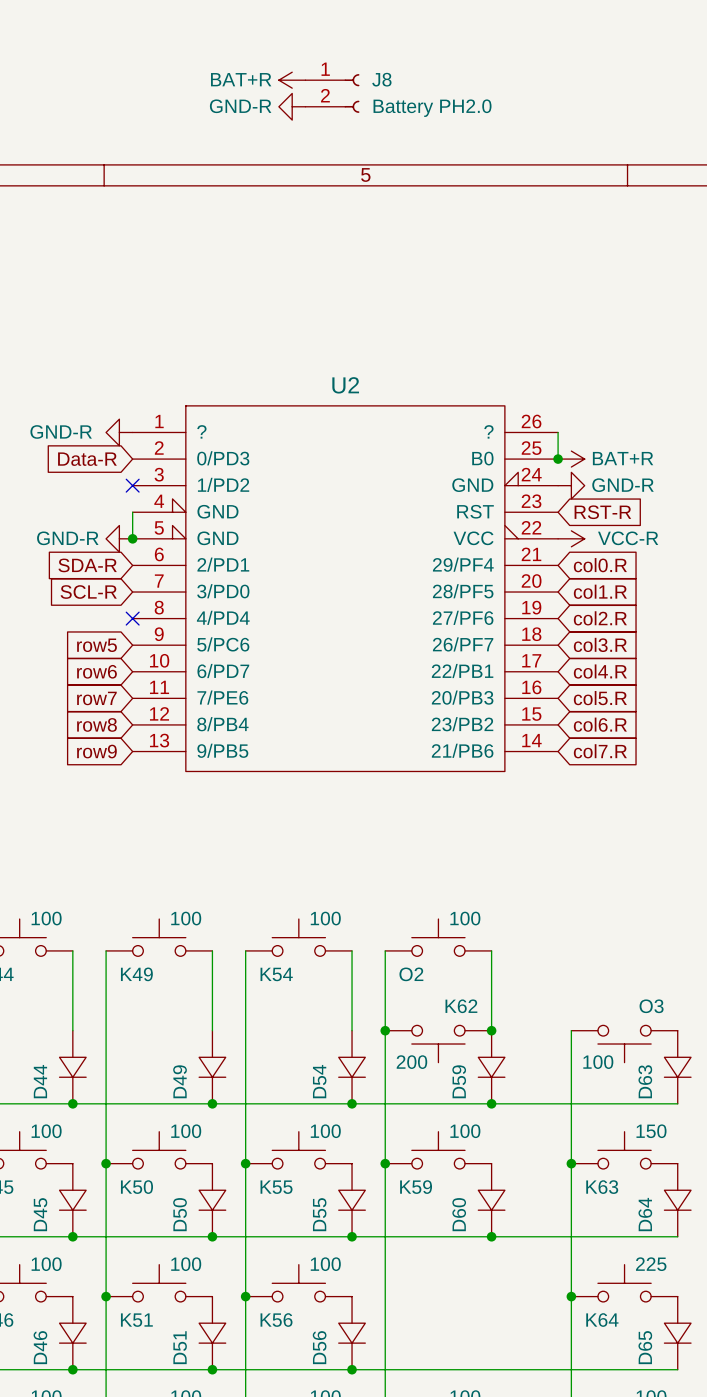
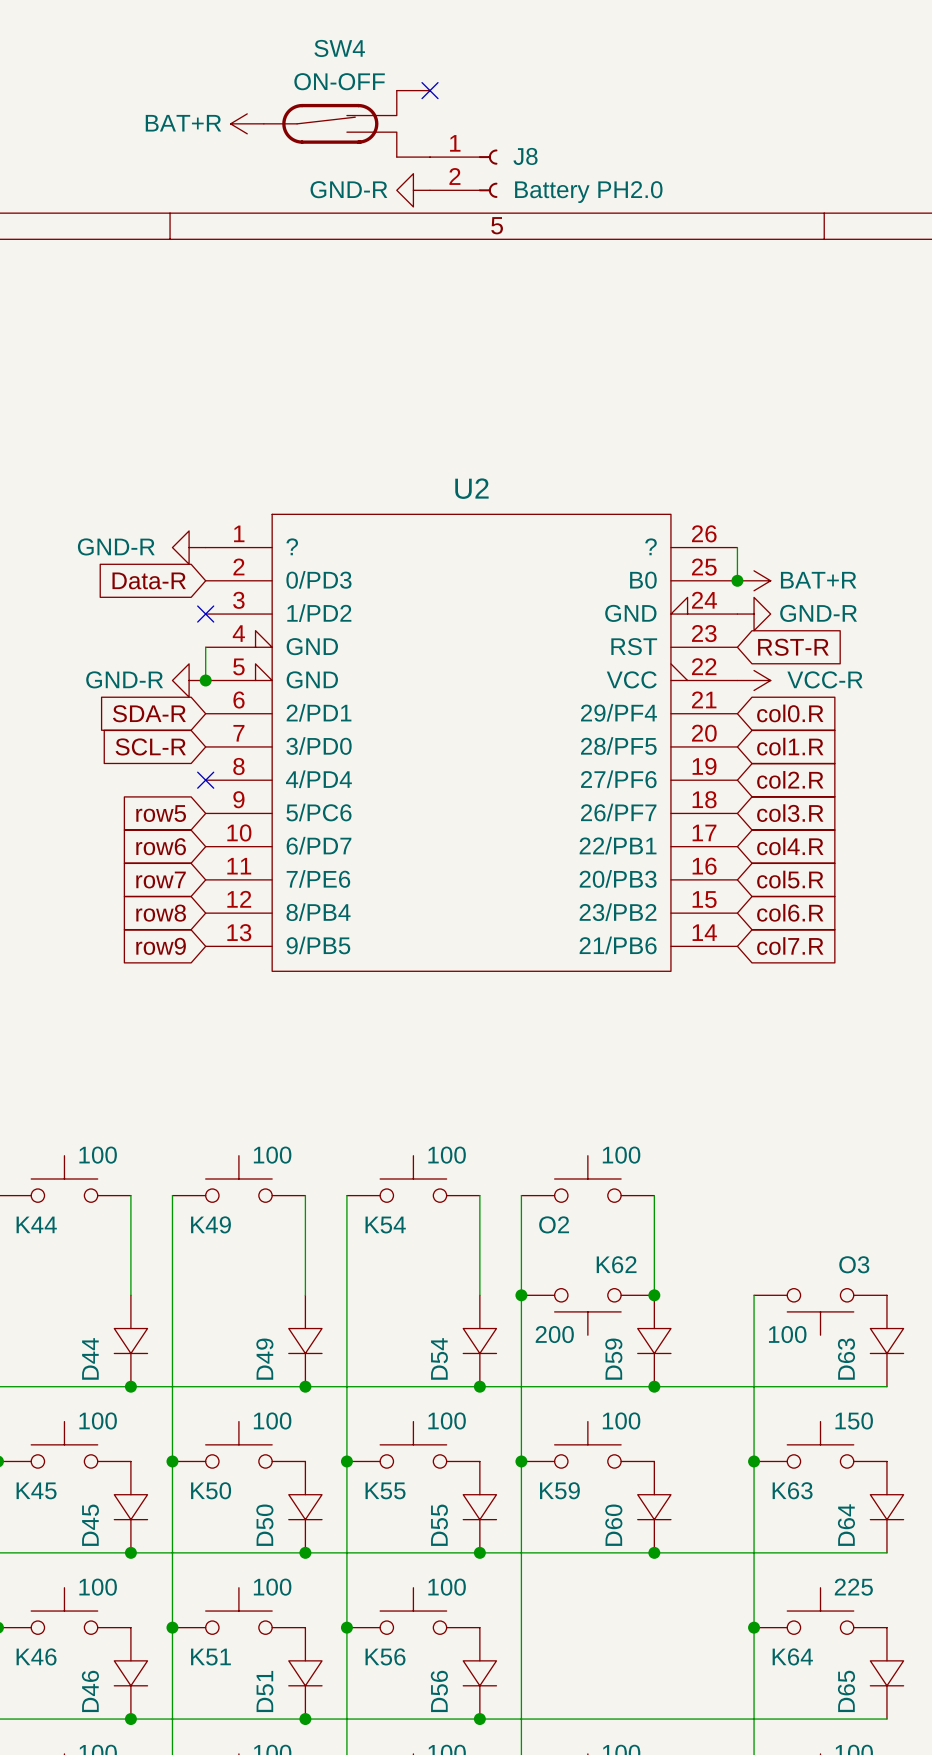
no-connect mark: none -> (430, 90)
power symbol position: BAT+R (292, 80) -> BAT+R (247, 123)
SW4: none -> ON-OFF (346, 123)
J8 position: (332, 93) -> (463, 173)
power symbol position: GND-R (292, 106) -> GND-R (413, 190)

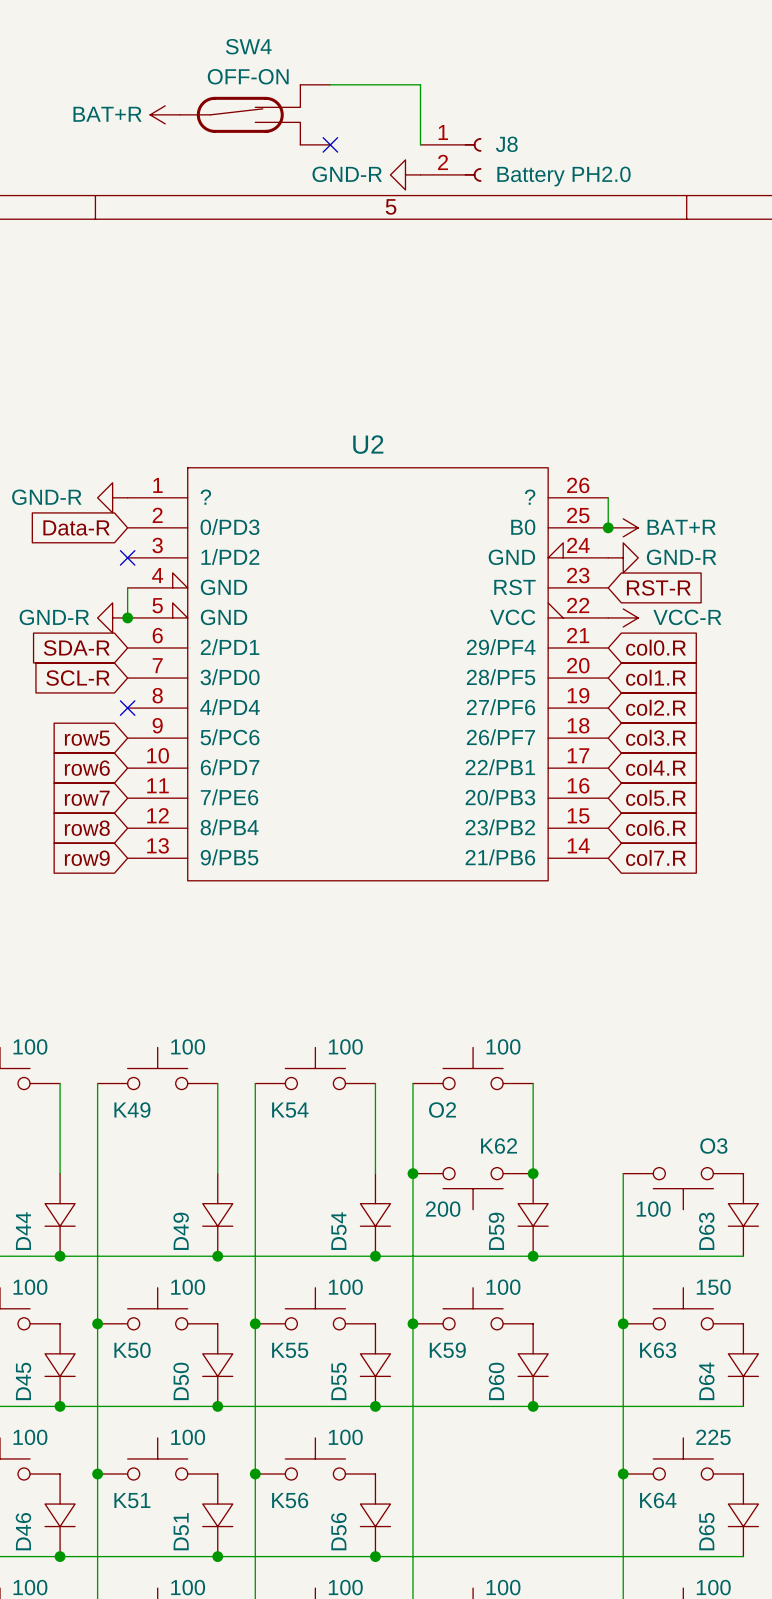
SW4 value: ON-OFF (339, 81) -> OFF-ON (248, 76)
wire: none -> (330, 84) (420, 84) (420, 144)
no-connect mark position: (430, 90) -> (330, 144)
J8 position: (463, 173) -> (450, 159)
power symbol position: GND-R (413, 190) -> GND-R (405, 174)

